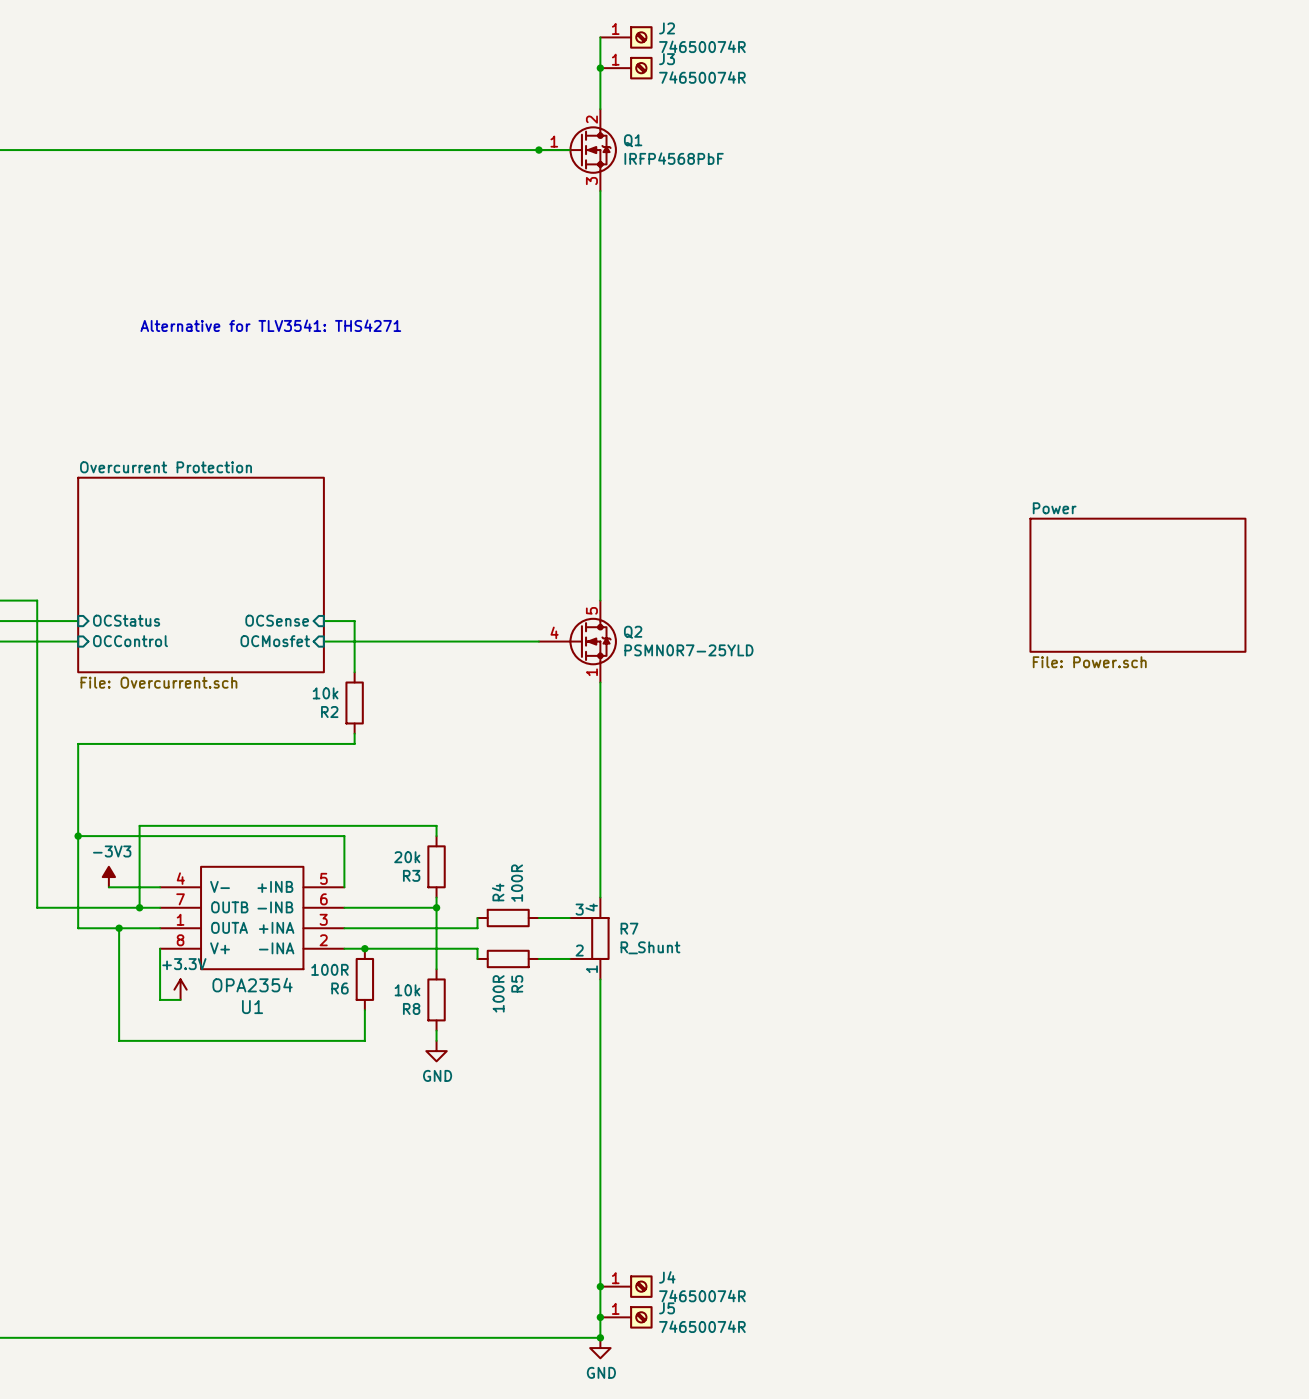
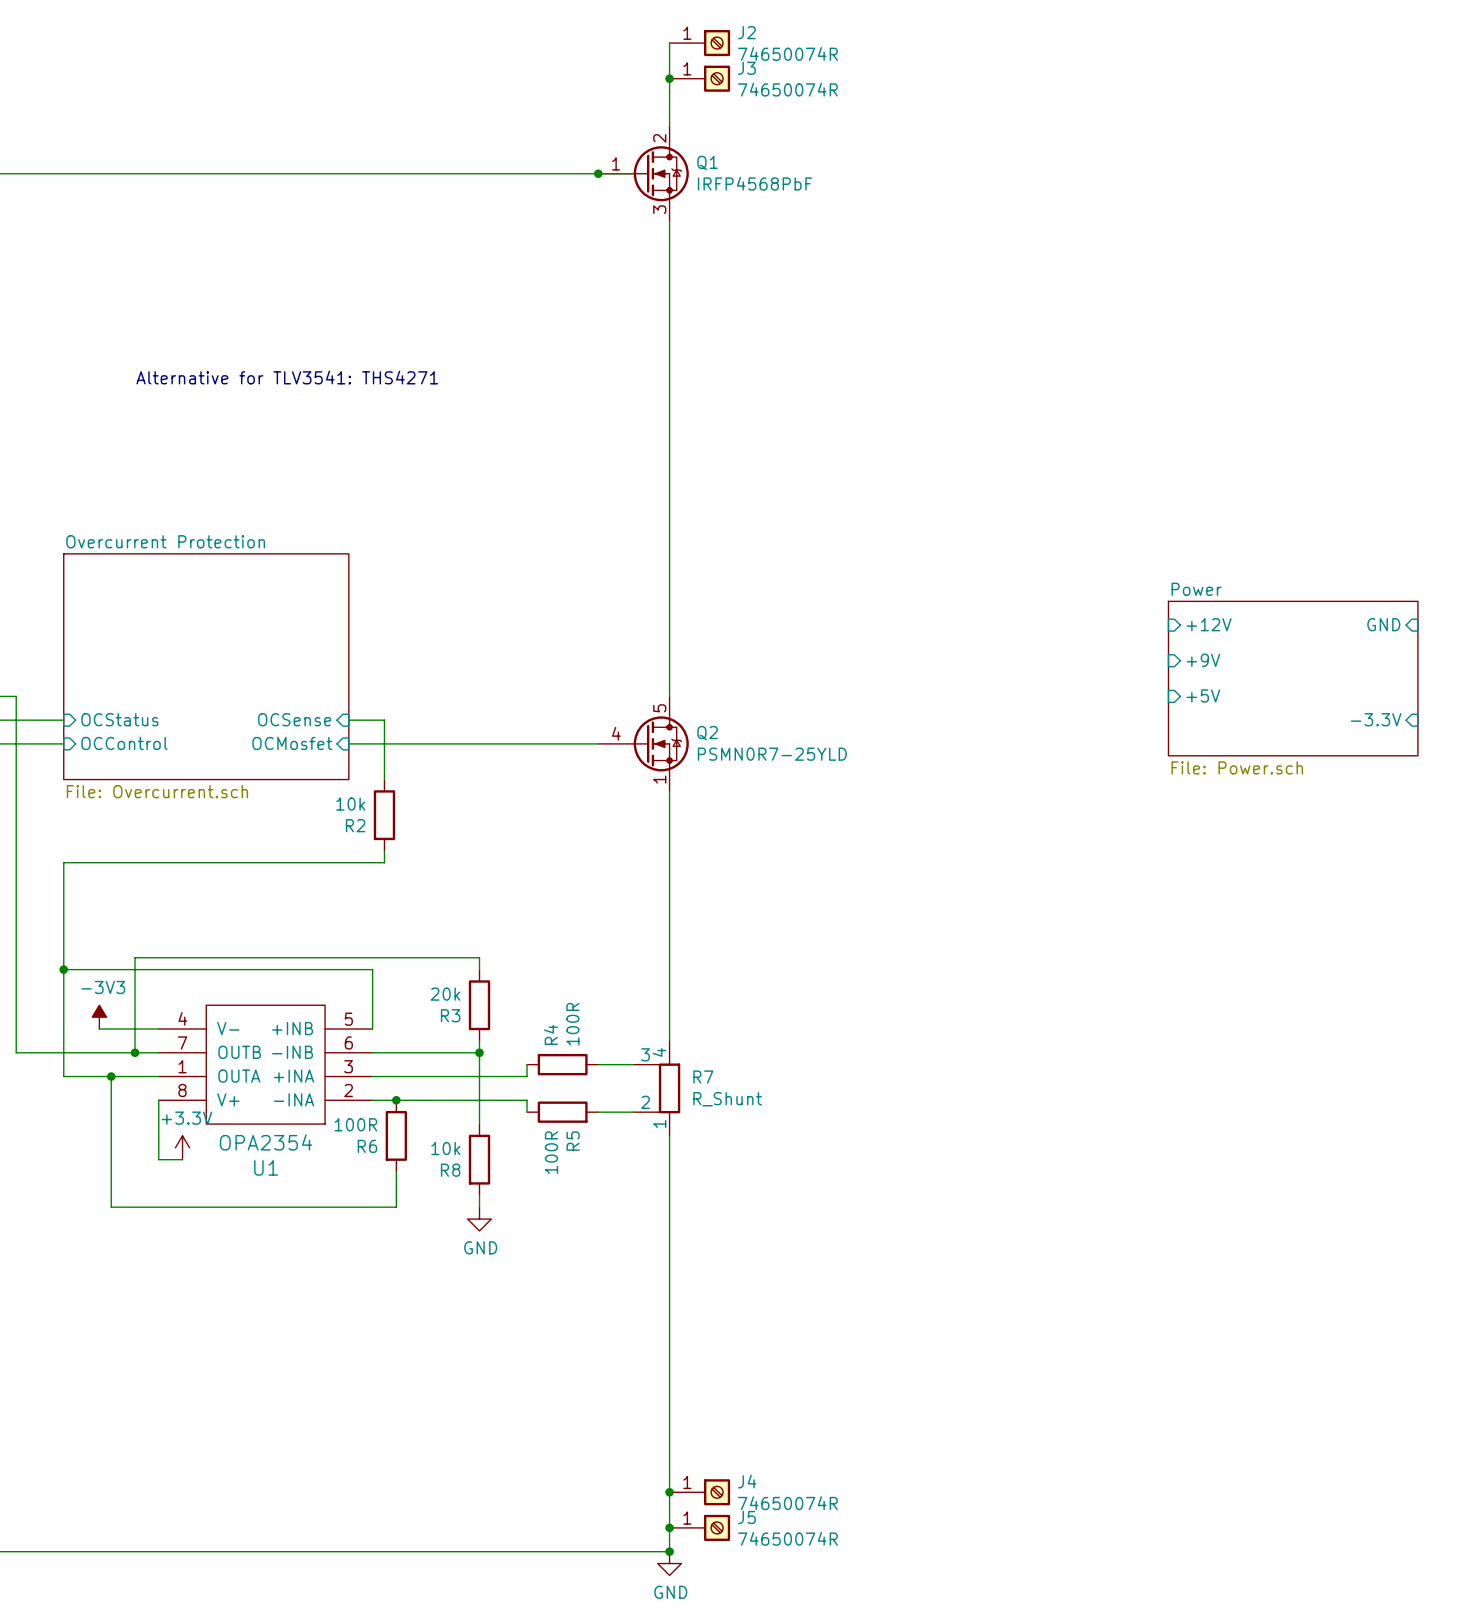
sheet pin: none -> +12V (1209, 624)
sheet pin: none -> GND (1383, 624)
sheet pin: none -> +9V (1203, 660)
sheet pin: none -> +5V (1203, 695)
sheet pin: none -> -3.3V (1376, 719)

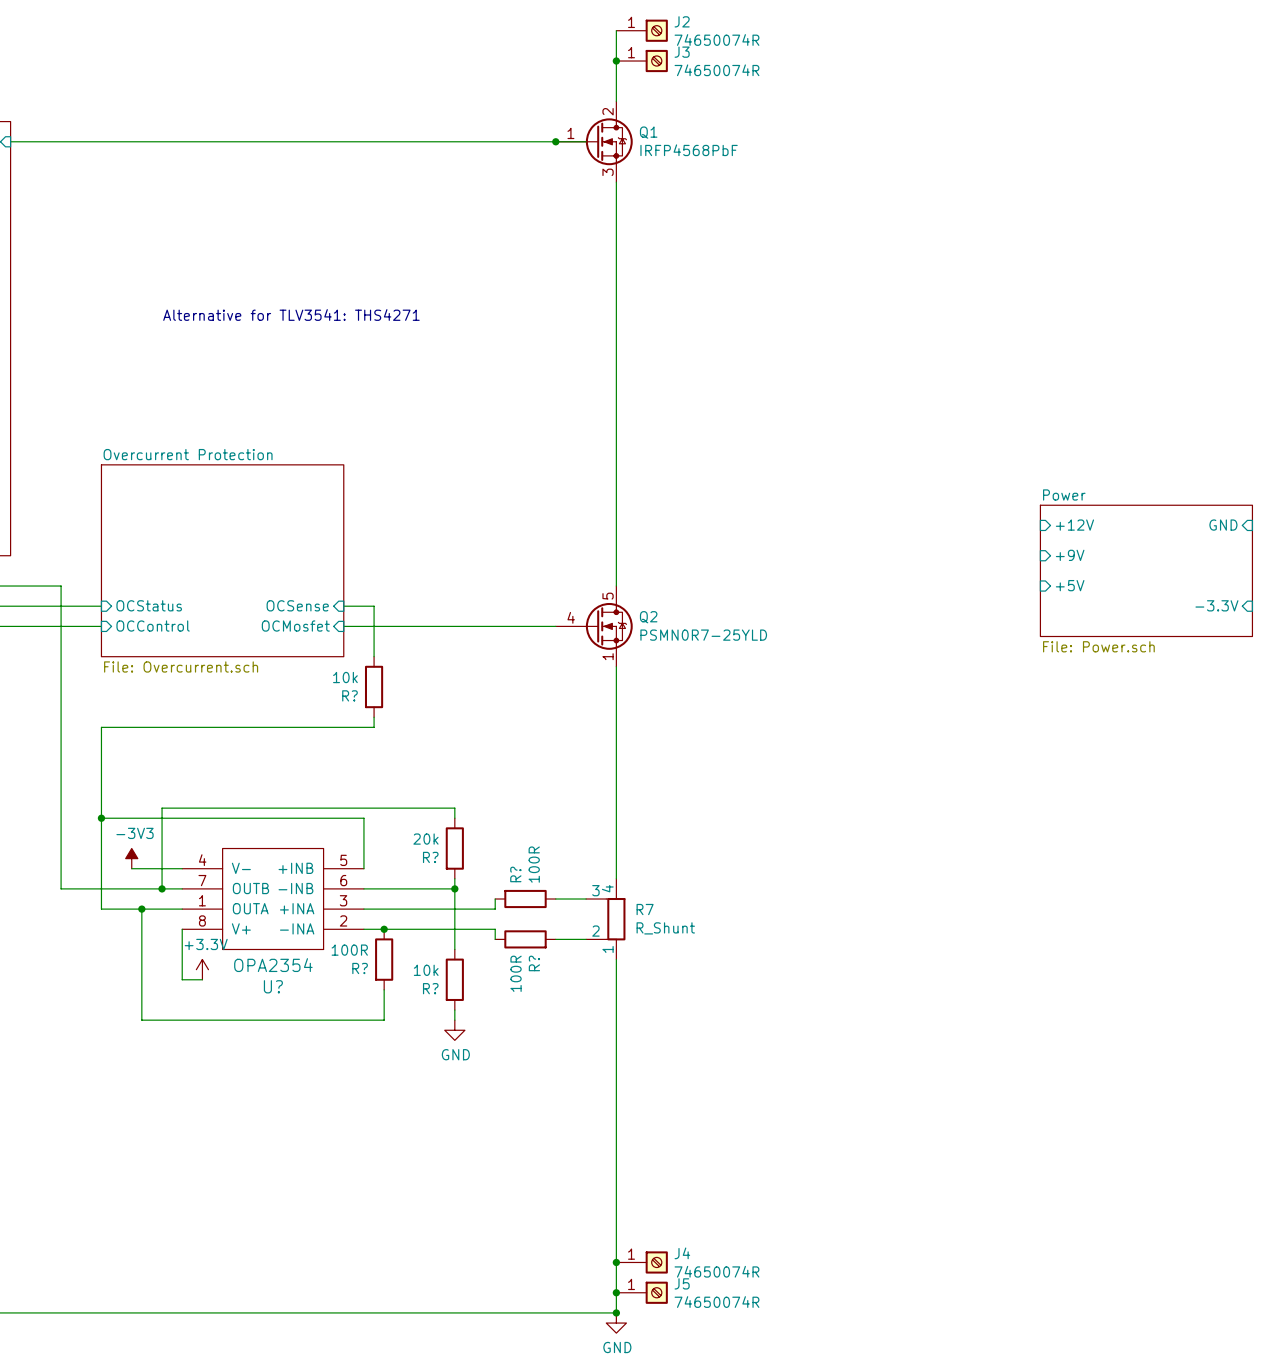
R2 name: R2 (355, 825) -> R? (349, 695)
R3 name: R3 (450, 1015) -> R? (430, 857)
R4 name: R4 (550, 1034) -> R? (515, 874)
R5 name: R5 (573, 1141) -> R? (534, 963)
R6 name: R6 (367, 1146) -> R? (360, 968)
U1 name: U1 (266, 1167) -> U? (273, 986)
R8 name: R8 (450, 1170) -> R? (430, 988)

